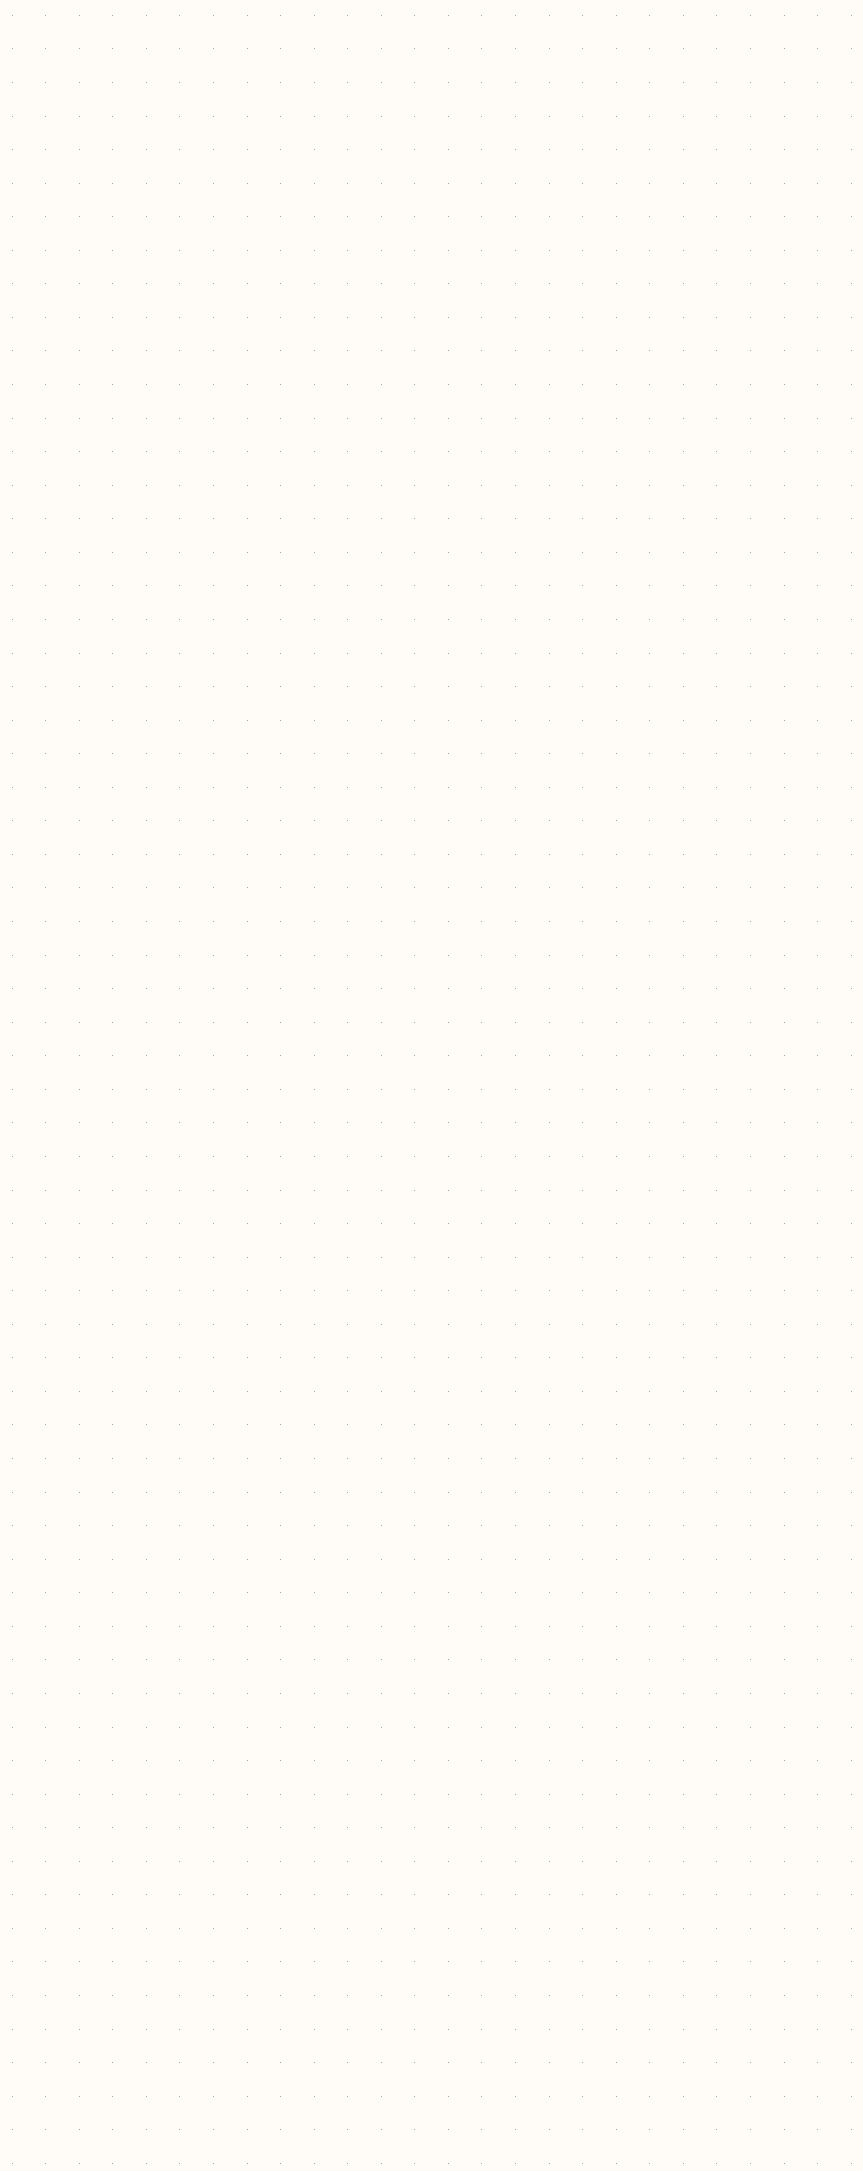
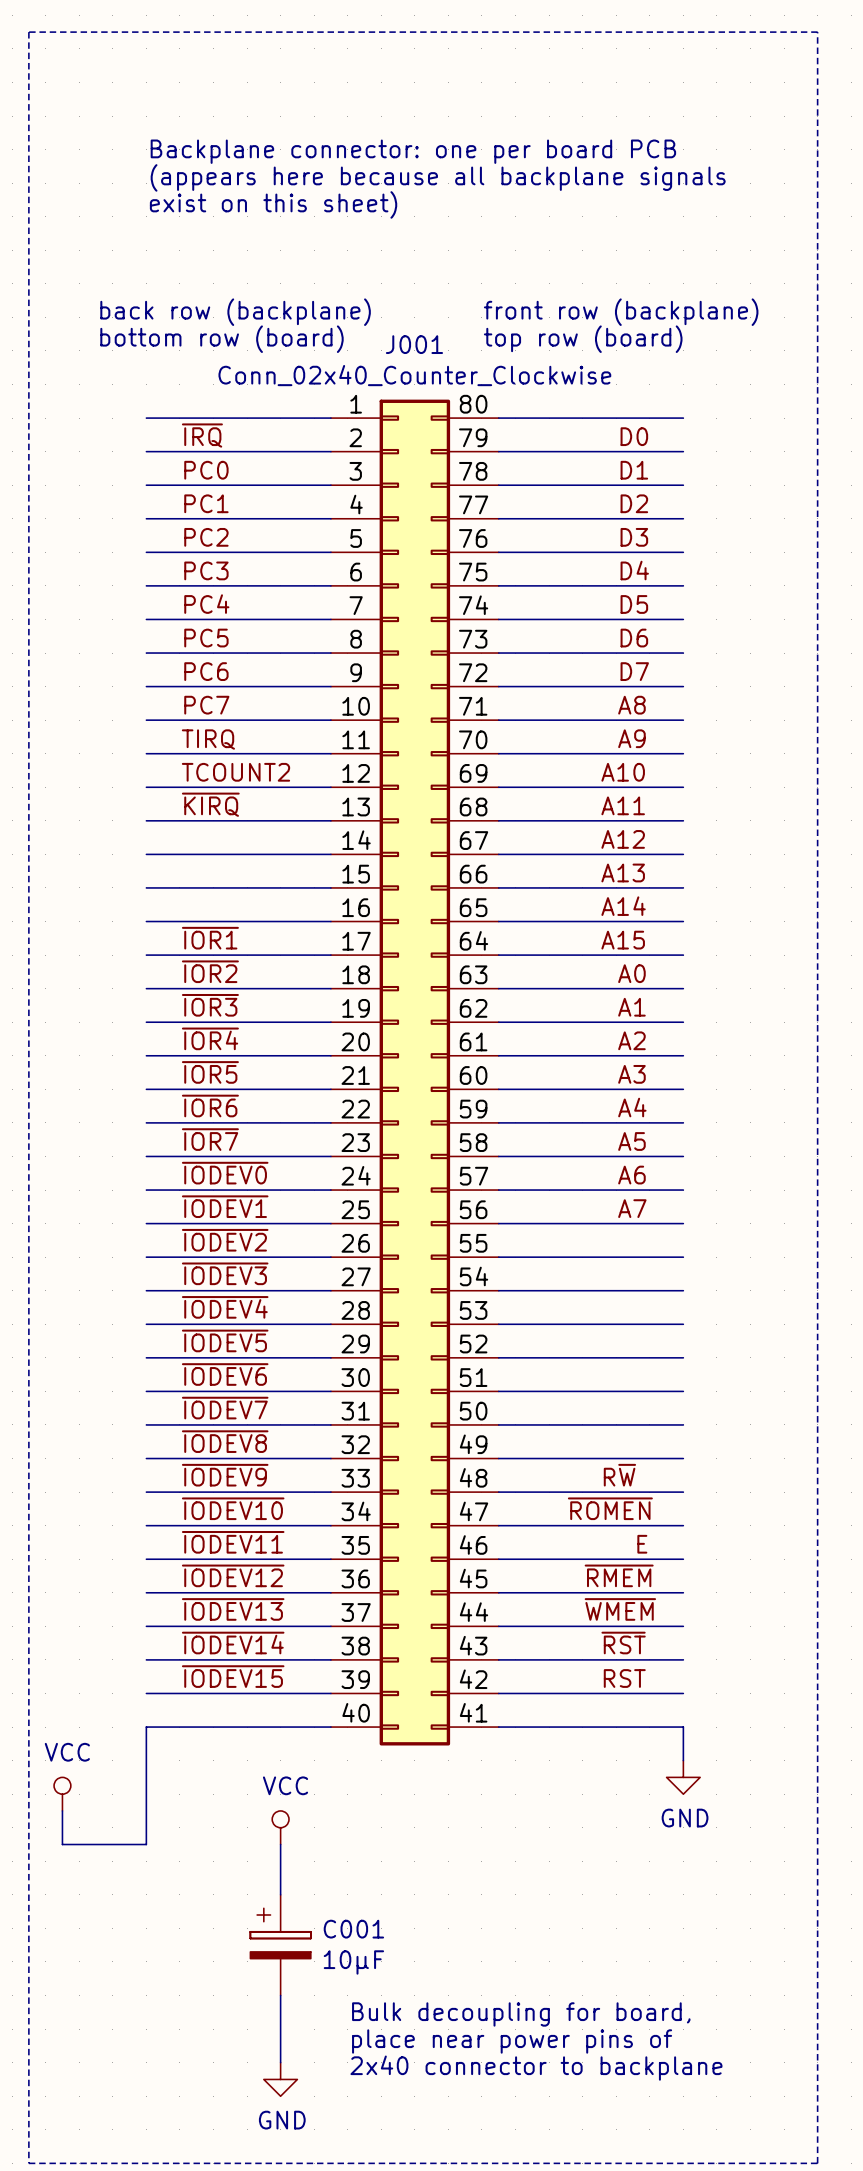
line: none -> (28, 32) (28, 2163) (817, 2163) (817, 32) (28, 32)
text: none -> Backplane connector: one per board PCB (413, 151)
text: none -> (appears here because all backplane signals (438, 177)
text: none -> exist on this sheet) (273, 204)
text: none -> back row (backplane) (235, 312)
text: none -> front row (backplane) (621, 312)
text: none -> bottom row (board) (222, 339)
text: none -> top row (board) (583, 339)
wire: none -> (146, 418) (330, 418)
wire: none -> (498, 418) (683, 418)
label: none -> ~{IRQ} (202, 435)
label: none -> D0 (634, 436)
wire: none -> (146, 451) (330, 451)
wire: none -> (498, 451) (683, 451)
label: none -> PC0 (206, 470)
label: none -> D1 (634, 470)
wire: none -> (146, 485) (330, 485)
wire: none -> (498, 485) (683, 485)
label: none -> PC1 (206, 503)
label: none -> D2 (634, 503)
wire: none -> (146, 518) (330, 518)
wire: none -> (498, 518) (683, 518)
label: none -> PC2 (206, 537)
label: none -> D3 (634, 537)
wire: none -> (146, 552) (330, 552)
wire: none -> (498, 552) (683, 552)
label: none -> PC3 (206, 570)
label: none -> D4 (634, 570)
wire: none -> (146, 585) (330, 585)
wire: none -> (498, 585) (683, 585)
label: none -> PC4 (206, 604)
label: none -> D5 (634, 604)
wire: none -> (146, 619) (330, 619)
wire: none -> (498, 619) (683, 619)
label: none -> PC5 (206, 638)
label: none -> D6 (634, 638)
wire: none -> (146, 653) (330, 653)
wire: none -> (498, 653) (683, 653)
label: none -> PC6 (206, 671)
label: none -> D7 (634, 671)
wire: none -> (146, 686) (330, 686)
wire: none -> (498, 686) (683, 686)
label: none -> PC7 (206, 705)
label: none -> A8 (631, 705)
wire: none -> (146, 720) (330, 720)
wire: none -> (498, 720) (683, 720)
label: none -> A9 (631, 738)
label: none -> TIRQ (208, 739)
wire: none -> (146, 753) (330, 753)
wire: none -> (498, 753) (683, 753)
label: none -> TCOUNT2 (235, 772)
label: none -> A10 (623, 772)
wire: none -> (146, 787) (330, 787)
wire: none -> (498, 787) (683, 787)
label: none -> ~{KIRQ} (210, 804)
label: none -> A11 (623, 805)
wire: none -> (146, 820) (330, 820)
wire: none -> (498, 820) (683, 820)
label: none -> A12 (623, 839)
wire: none -> (146, 854) (330, 854)
wire: none -> (498, 854) (683, 854)
label: none -> A13 (623, 872)
wire: none -> (146, 887) (330, 887)
wire: none -> (498, 887) (683, 887)
label: none -> A14 (623, 906)
wire: none -> (146, 921) (330, 921)
wire: none -> (498, 921) (683, 921)
label: none -> ~{IOR1} (210, 938)
label: none -> A15 (623, 940)
wire: none -> (146, 955) (330, 955)
wire: none -> (498, 955) (683, 955)
label: none -> ~{IOR2} (210, 971)
label: none -> A0 (631, 973)
wire: none -> (146, 988) (330, 988)
wire: none -> (498, 988) (683, 988)
label: none -> ~{IOR3} (210, 1005)
label: none -> A1 (631, 1007)
wire: none -> (146, 1022) (330, 1022)
wire: none -> (498, 1022) (683, 1022)
label: none -> ~{IOR4} (210, 1038)
label: none -> A2 (631, 1040)
wire: none -> (146, 1055) (330, 1055)
wire: none -> (498, 1055) (683, 1055)
label: none -> ~{IOR5} (210, 1072)
J001: none -> Conn_02x40_Counter_Clockwise (414, 1072)
label: none -> A3 (631, 1074)
wire: none -> (146, 1089) (330, 1089)
wire: none -> (498, 1089) (683, 1089)
label: none -> ~{IOR6} (210, 1106)
label: none -> A4 (632, 1107)
wire: none -> (146, 1122) (330, 1122)
wire: none -> (498, 1122) (683, 1122)
label: none -> ~{IOR7} (210, 1139)
label: none -> A5 (631, 1141)
wire: none -> (146, 1156) (330, 1156)
wire: none -> (498, 1156) (683, 1156)
label: none -> ~{IODEV0} (225, 1173)
label: none -> A6 (631, 1175)
wire: none -> (146, 1190) (330, 1190)
wire: none -> (498, 1190) (683, 1190)
label: none -> ~{IODEV1} (225, 1206)
label: none -> A7 (632, 1208)
wire: none -> (146, 1223) (330, 1223)
wire: none -> (498, 1223) (683, 1223)
label: none -> ~{IODEV2} (225, 1240)
wire: none -> (146, 1257) (330, 1257)
wire: none -> (498, 1257) (683, 1257)
label: none -> ~{IODEV3} (225, 1273)
wire: none -> (146, 1290) (330, 1290)
wire: none -> (498, 1290) (683, 1290)
label: none -> ~{IODEV4} (225, 1307)
wire: none -> (146, 1324) (330, 1324)
wire: none -> (498, 1324) (683, 1324)
label: none -> ~{IODEV5} (225, 1340)
wire: none -> (146, 1357) (330, 1357)
wire: none -> (498, 1357) (683, 1357)
label: none -> ~{IODEV6} (225, 1374)
wire: none -> (146, 1391) (330, 1391)
wire: none -> (498, 1391) (683, 1391)
label: none -> ~{IODEV7} (225, 1408)
wire: none -> (146, 1424) (330, 1424)
wire: none -> (498, 1424) (683, 1424)
label: none -> ~{IODEV8} (225, 1441)
wire: none -> (146, 1458) (330, 1458)
wire: none -> (498, 1458) (683, 1458)
label: none -> ~{IODEV9} (225, 1475)
label: none -> R~{W} (619, 1475)
wire: none -> (146, 1492) (330, 1492)
wire: none -> (498, 1492) (683, 1492)
label: none -> ~{IODEV10} (233, 1508)
label: none -> ~{ROMEN} (610, 1508)
wire: none -> (146, 1525) (330, 1525)
wire: none -> (498, 1525) (683, 1525)
label: none -> ~{IODEV11} (233, 1542)
label: none -> E (642, 1544)
wire: none -> (146, 1559) (330, 1559)
wire: none -> (498, 1559) (683, 1559)
label: none -> ~{IODEV12} (233, 1575)
label: none -> ~{RMEM} (619, 1575)
wire: none -> (146, 1592) (330, 1592)
wire: none -> (498, 1592) (683, 1592)
label: none -> ~{IODEV13} (233, 1609)
label: none -> ~{WMEM} (620, 1609)
wire: none -> (146, 1626) (330, 1626)
wire: none -> (498, 1626) (683, 1626)
label: none -> ~{IODEV14} (233, 1643)
label: none -> ~{RST} (623, 1643)
wire: none -> (146, 1659) (330, 1659)
wire: none -> (498, 1659) (683, 1659)
label: none -> ~{IODEV15} (233, 1676)
label: none -> RST (624, 1678)
wire: none -> (146, 1693) (330, 1693)
wire: none -> (498, 1693) (683, 1693)
wire: none -> (330, 1727) (146, 1727) (146, 1844) (62, 1844) (62, 1810)
wire: none -> (498, 1727) (683, 1727) (683, 1760)
power symbol: none -> GND (683, 1777)
power symbol: none -> VCC (62, 1794)
power symbol: none -> VCC (280, 1827)
wire: none -> (280, 1844) (280, 1894)
C001: none -> 10μF (280, 1945)
wire: none -> (280, 1995) (280, 2062)
text: none -> Bulk decoupling for board, (521, 2014)
text: none -> place near power pins of (512, 2041)
text: none -> 2x40 connector to backplane (536, 2068)
power symbol: none -> GND (280, 2079)

